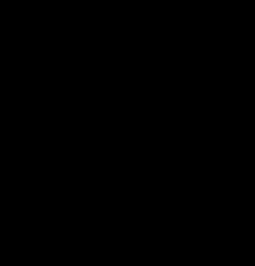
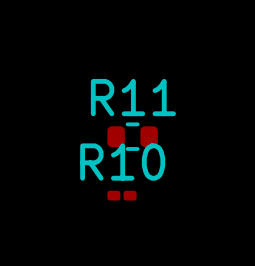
R11: none -> (132, 136)
R10: none -> (121, 195)

